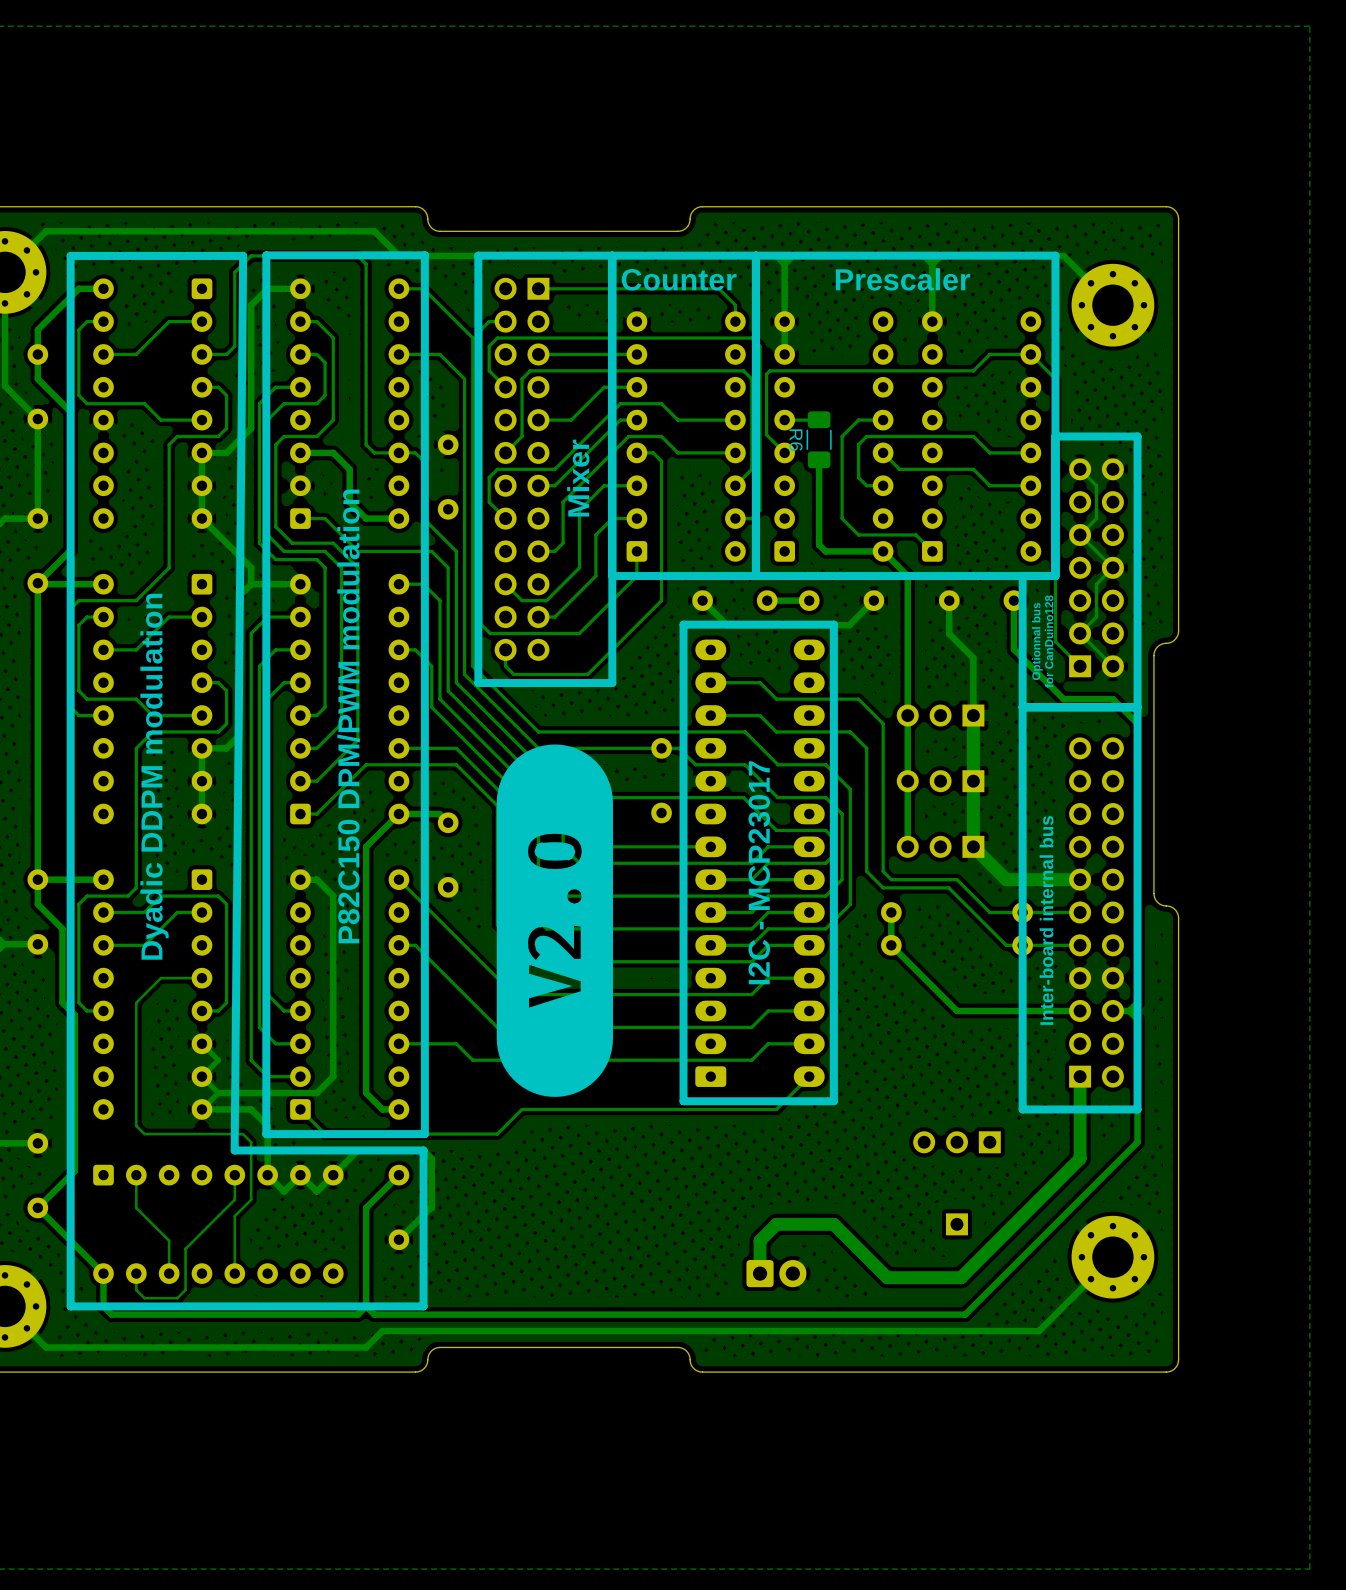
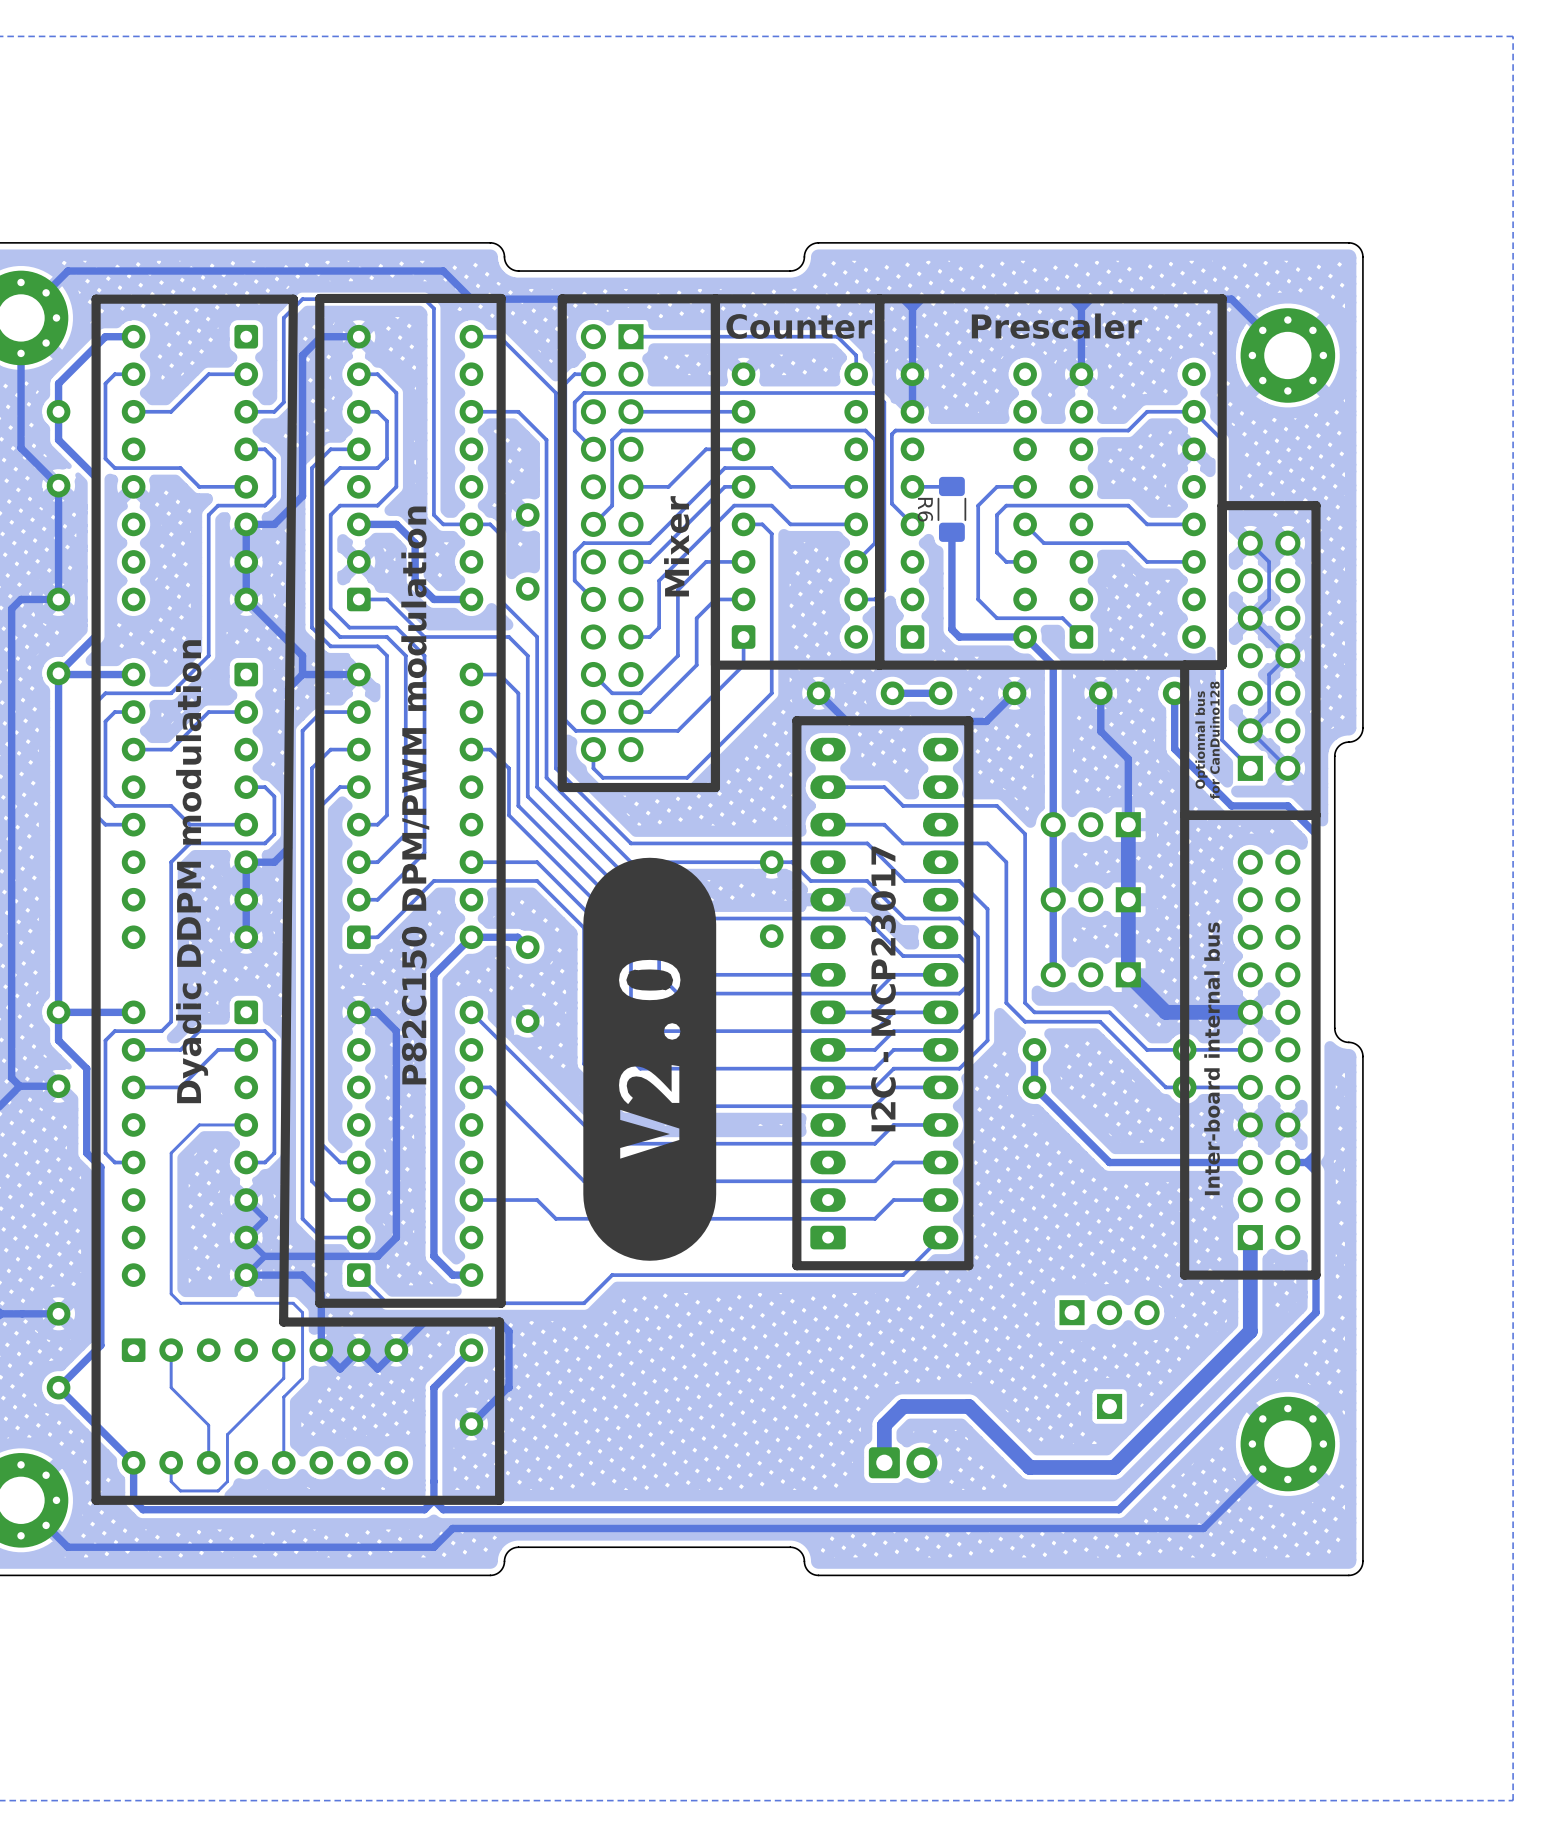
part rotation: 0° (956, 1142) -> 180° (1109, 1312)

